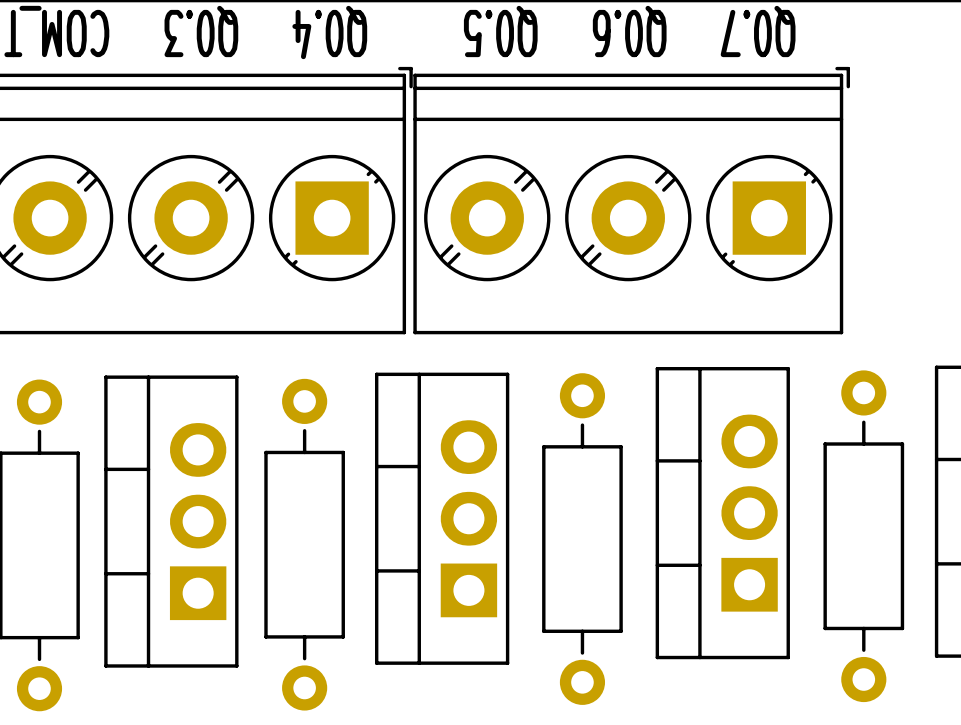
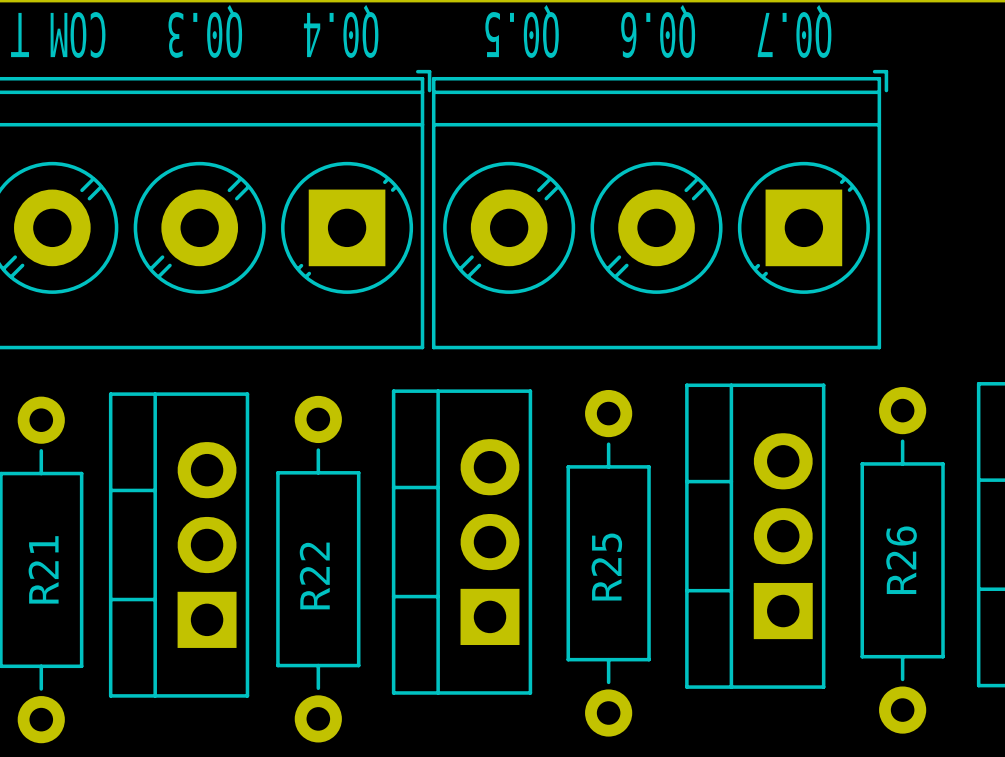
R26 name: none -> R26 (901, 560)
R25 name: none -> R25 (606, 567)
R21 name: none -> R21 (43, 569)
R22 name: none -> R22 (314, 575)

